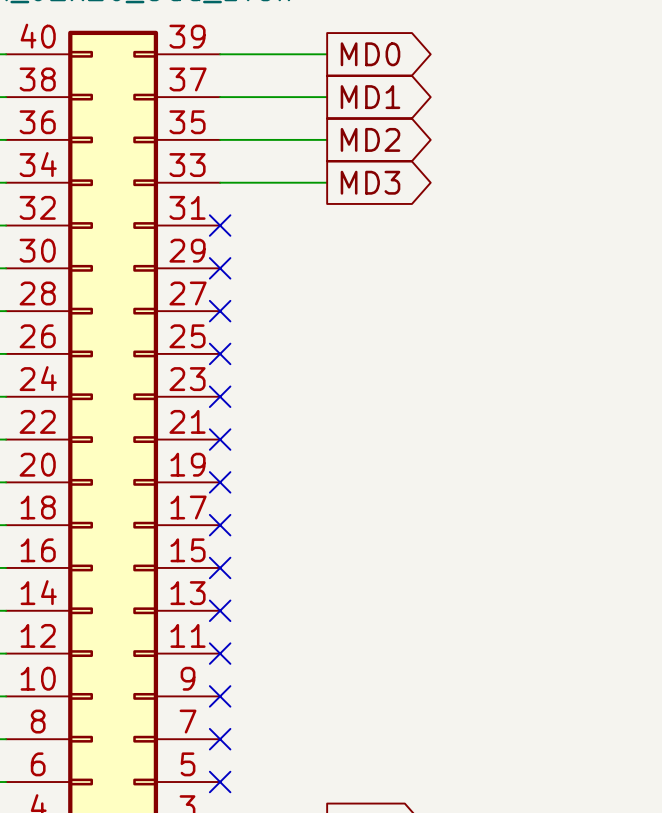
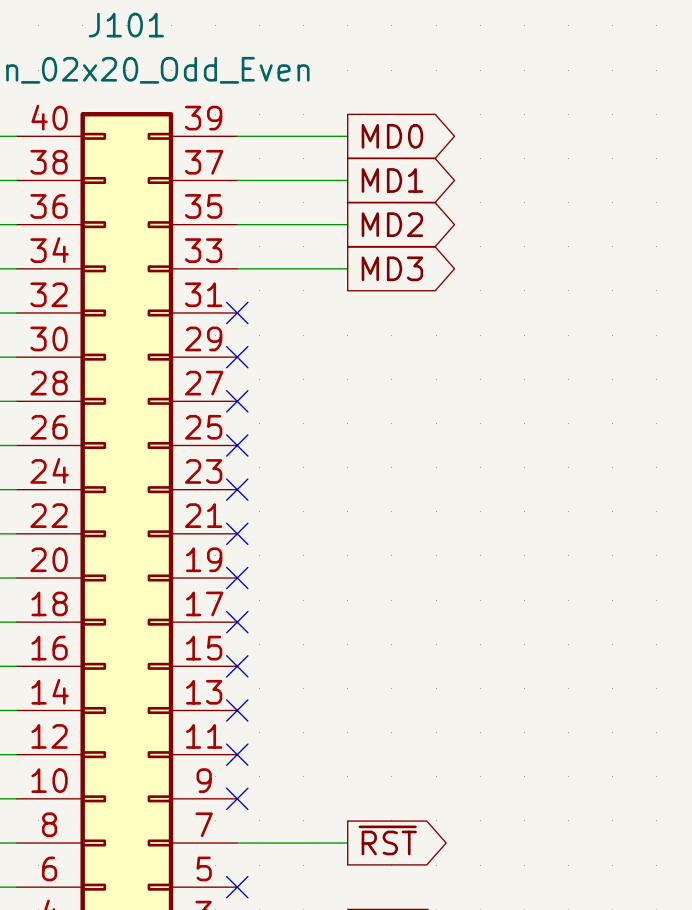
global label: none -> ~{RST} (387, 840)
wire: none -> (237, 842) (347, 842)
no-connect mark: (220, 739) -> none

